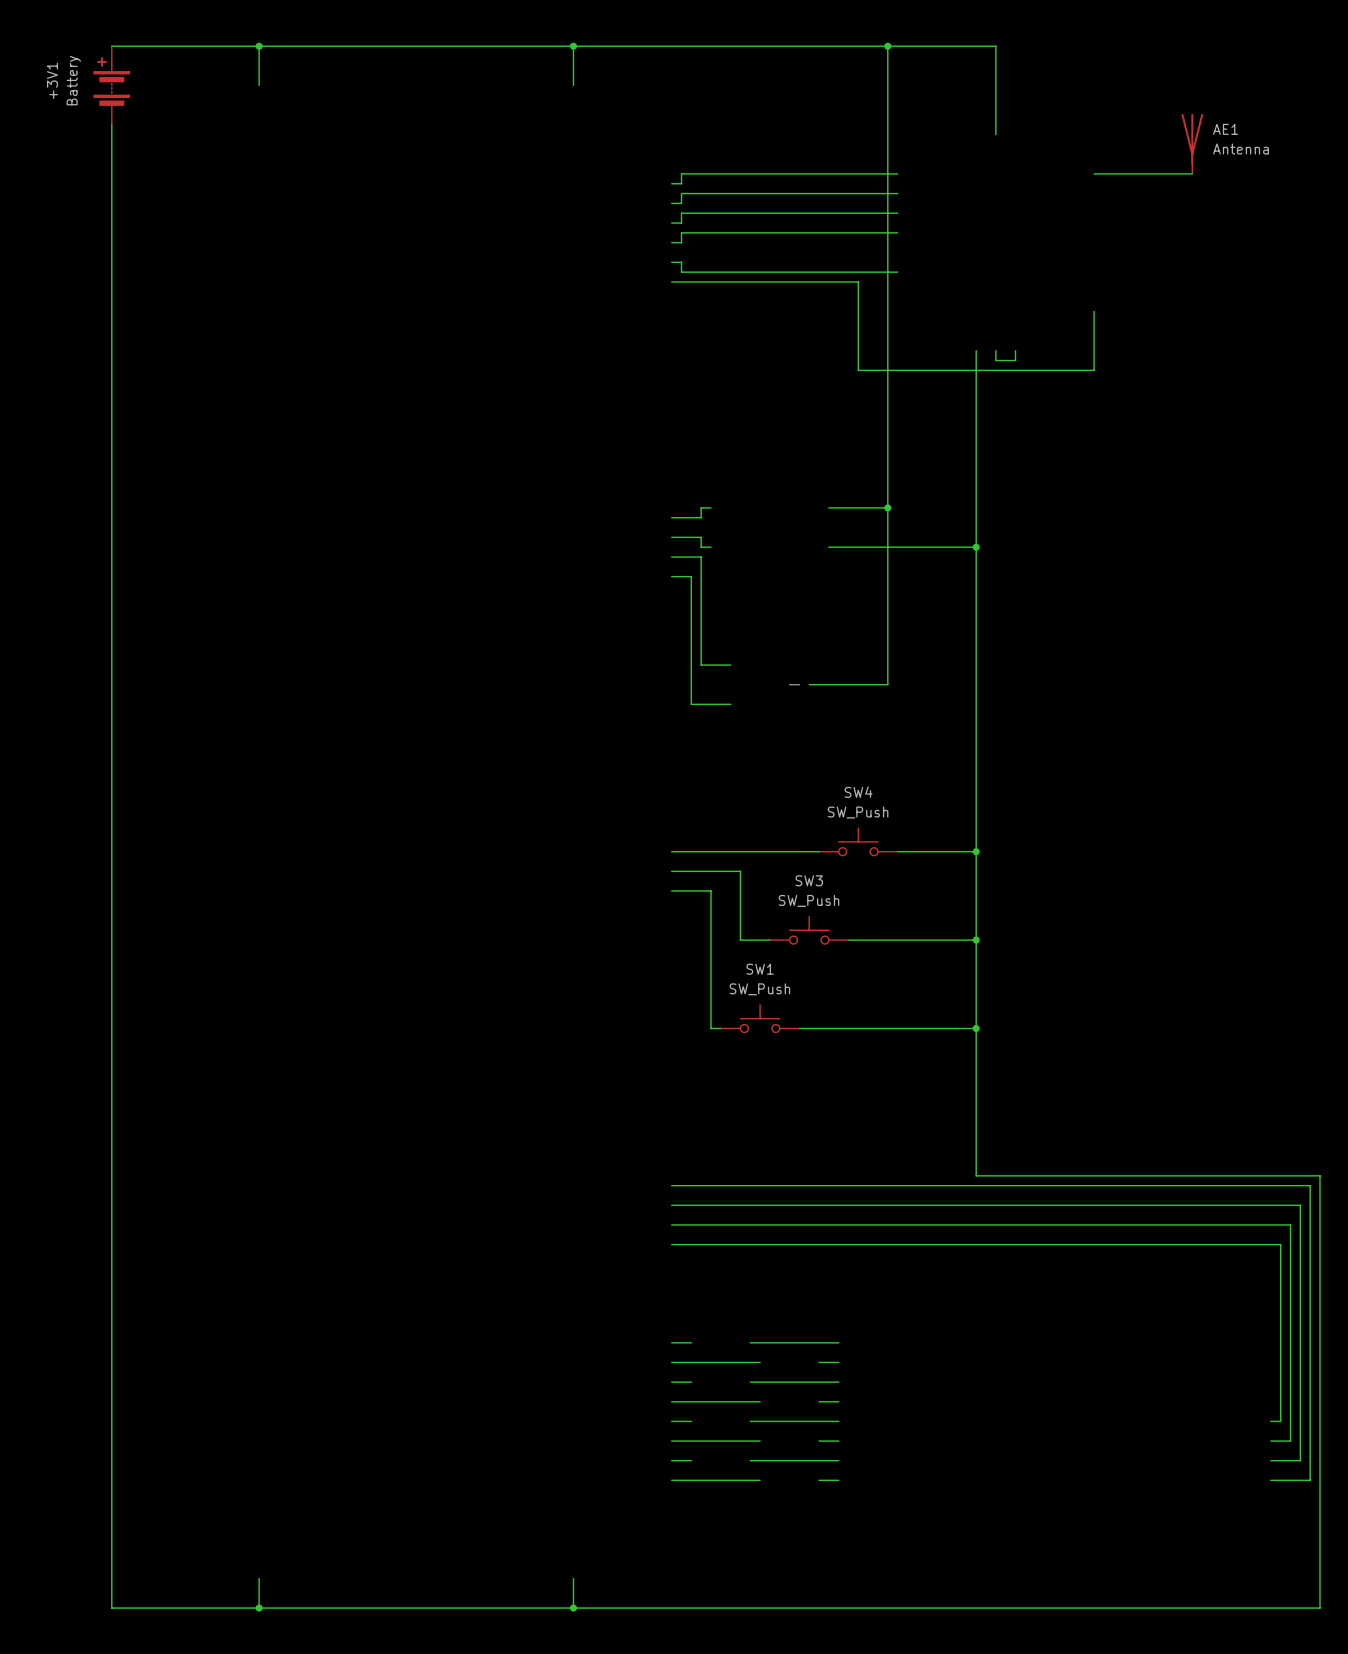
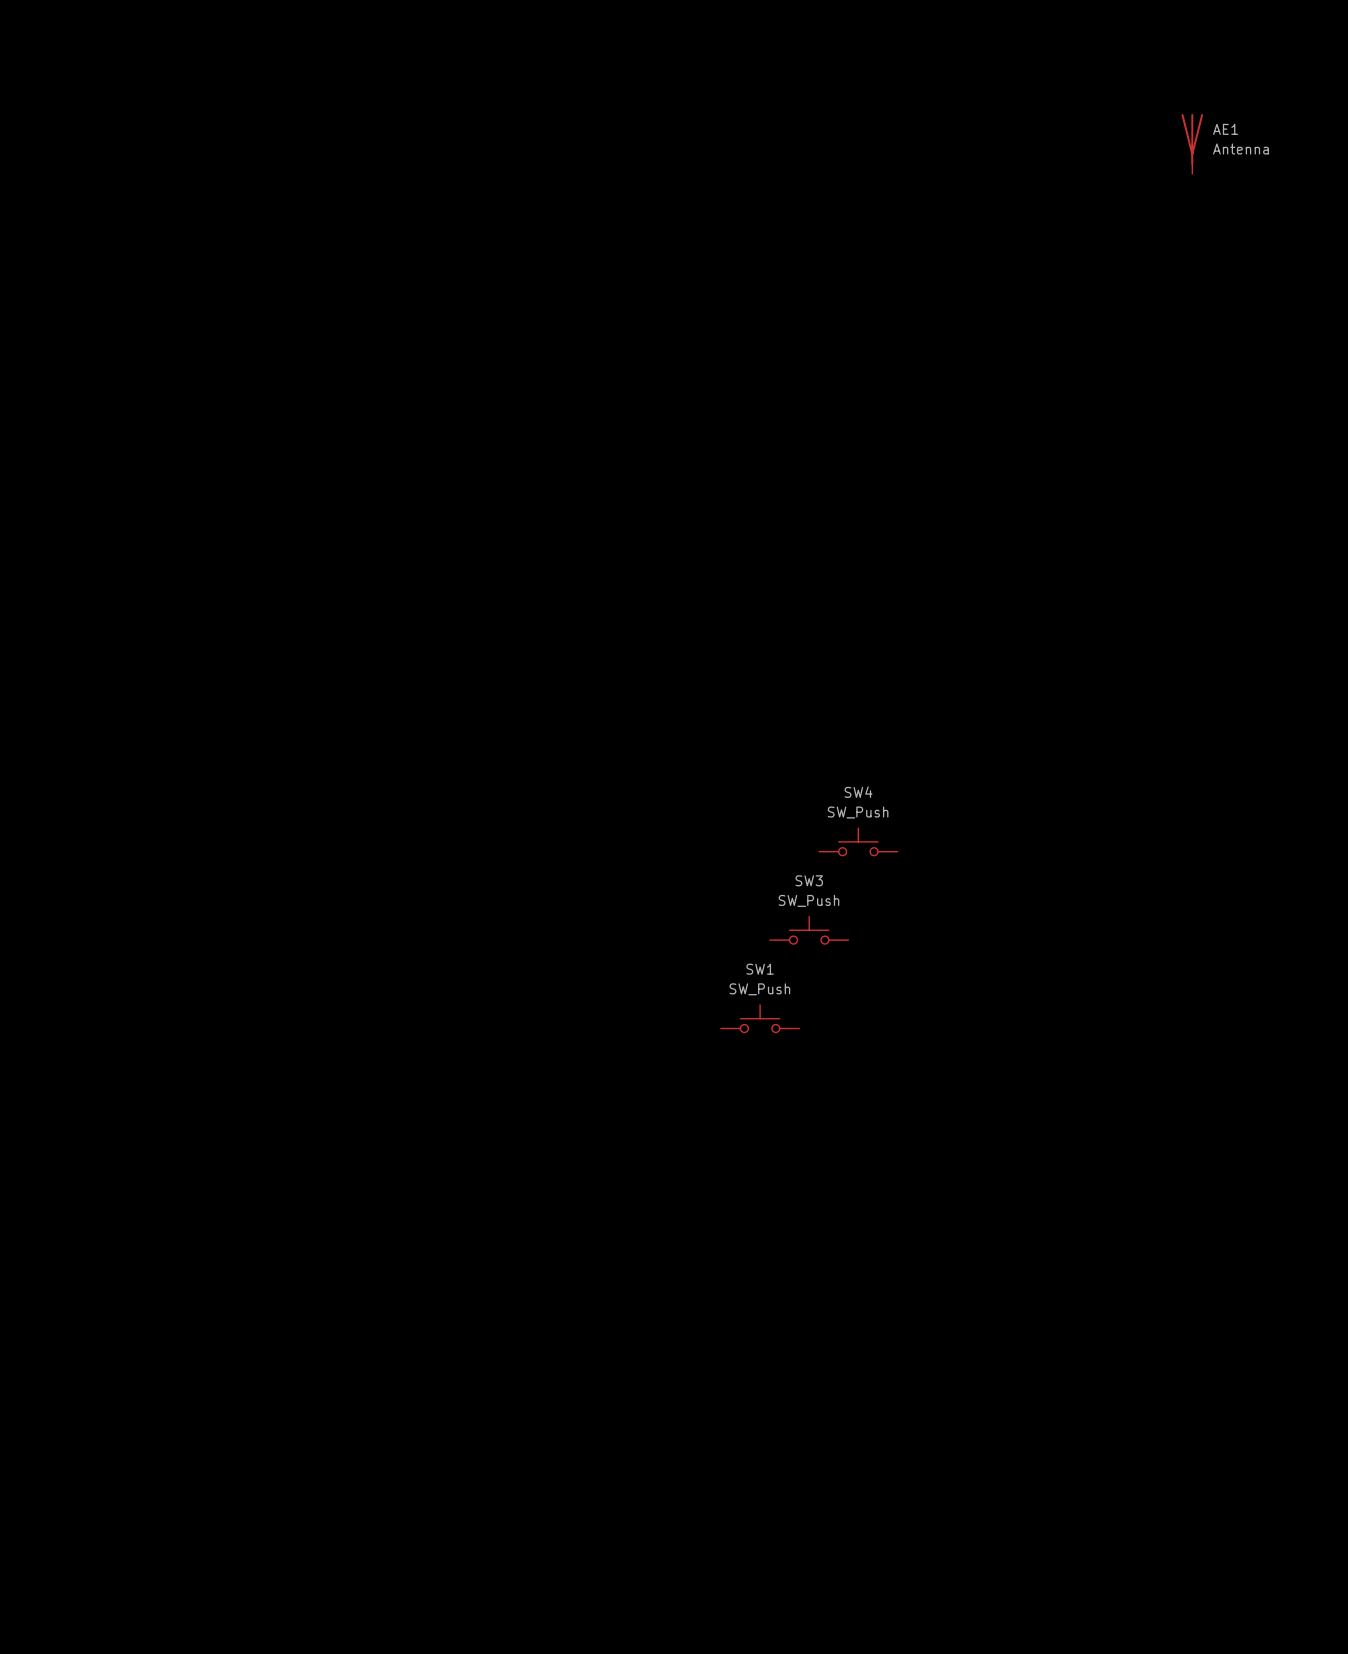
wire: (111, 46) (995, 46) (995, 134) -> none
wire: (259, 46) (259, 85) -> none
junction: (259, 46) -> none
wire: (573, 46) (573, 85) -> none
junction: (573, 46) -> none
wire: (887, 46) (887, 684) (809, 684) -> none
junction: (887, 46) -> none
+3V1: Battery (111, 85) -> none
wire: (111, 124) (111, 1608) (1320, 1608) (1320, 1175) (976, 1175) (976, 350) -> none
wire: (897, 173) (681, 173) (681, 183) (671, 183) -> none
wire: (1094, 173) (1192, 173) -> none
wire: (897, 193) (681, 193) (681, 203) (671, 203) -> none
wire: (897, 213) (681, 213) (681, 223) (671, 223) -> none
wire: (897, 232) (681, 232) (681, 242) (671, 242) -> none
wire: (671, 262) (681, 262) (681, 272) (897, 272) -> none
wire: (671, 281) (858, 281) (858, 370) (1094, 370) (1094, 311) -> none
wire: (995, 350) (995, 360) (1015, 360) (1015, 350) -> none
wire: (710, 507) (701, 507) (701, 517) (671, 517) -> none
wire: (828, 507) (887, 507) -> none
junction: (887, 507) -> none
wire: (671, 537) (701, 537) (701, 547) (710, 547) -> none
wire: (828, 547) (976, 547) -> none
junction: (976, 547) -> none
wire: (671, 557) (701, 557) (701, 665) (730, 665) -> none
wire: (671, 576) (691, 576) (691, 704) (730, 704) -> none
line: (789, 684) (799, 684) -> none
wire: (671, 851) (819, 851) -> none
wire: (897, 851) (976, 851) -> none
junction: (976, 851) -> none
wire: (671, 871) (740, 871) (740, 940) (769, 940) -> none
wire: (671, 890) (710, 890) (710, 1028) (720, 1028) -> none
wire: (848, 940) (976, 940) -> none
junction: (976, 940) -> none
wire: (799, 1028) (976, 1028) -> none
junction: (976, 1028) -> none
wire: (671, 1185) (1310, 1185) (1310, 1480) (1270, 1480) -> none
wire: (671, 1205) (1300, 1205) (1300, 1460) (1270, 1460) -> none
wire: (671, 1224) (1290, 1224) (1290, 1441) (1270, 1441) -> none
wire: (671, 1244) (1280, 1244) (1280, 1421) (1270, 1421) -> none
wire: (671, 1342) (691, 1342) -> none
wire: (750, 1342) (838, 1342) -> none
wire: (671, 1362) (760, 1362) -> none
wire: (819, 1362) (838, 1362) -> none
wire: (671, 1382) (691, 1382) -> none
wire: (750, 1382) (838, 1382) -> none
wire: (671, 1401) (760, 1401) -> none
wire: (819, 1401) (838, 1401) -> none
wire: (671, 1421) (691, 1421) -> none
wire: (750, 1421) (838, 1421) -> none
wire: (671, 1441) (760, 1441) -> none
wire: (819, 1441) (838, 1441) -> none
wire: (671, 1460) (691, 1460) -> none
wire: (750, 1460) (838, 1460) -> none
wire: (671, 1480) (760, 1480) -> none
wire: (819, 1480) (838, 1480) -> none
wire: (259, 1578) (259, 1608) -> none
wire: (573, 1578) (573, 1608) -> none
junction: (259, 1608) -> none
junction: (573, 1608) -> none

